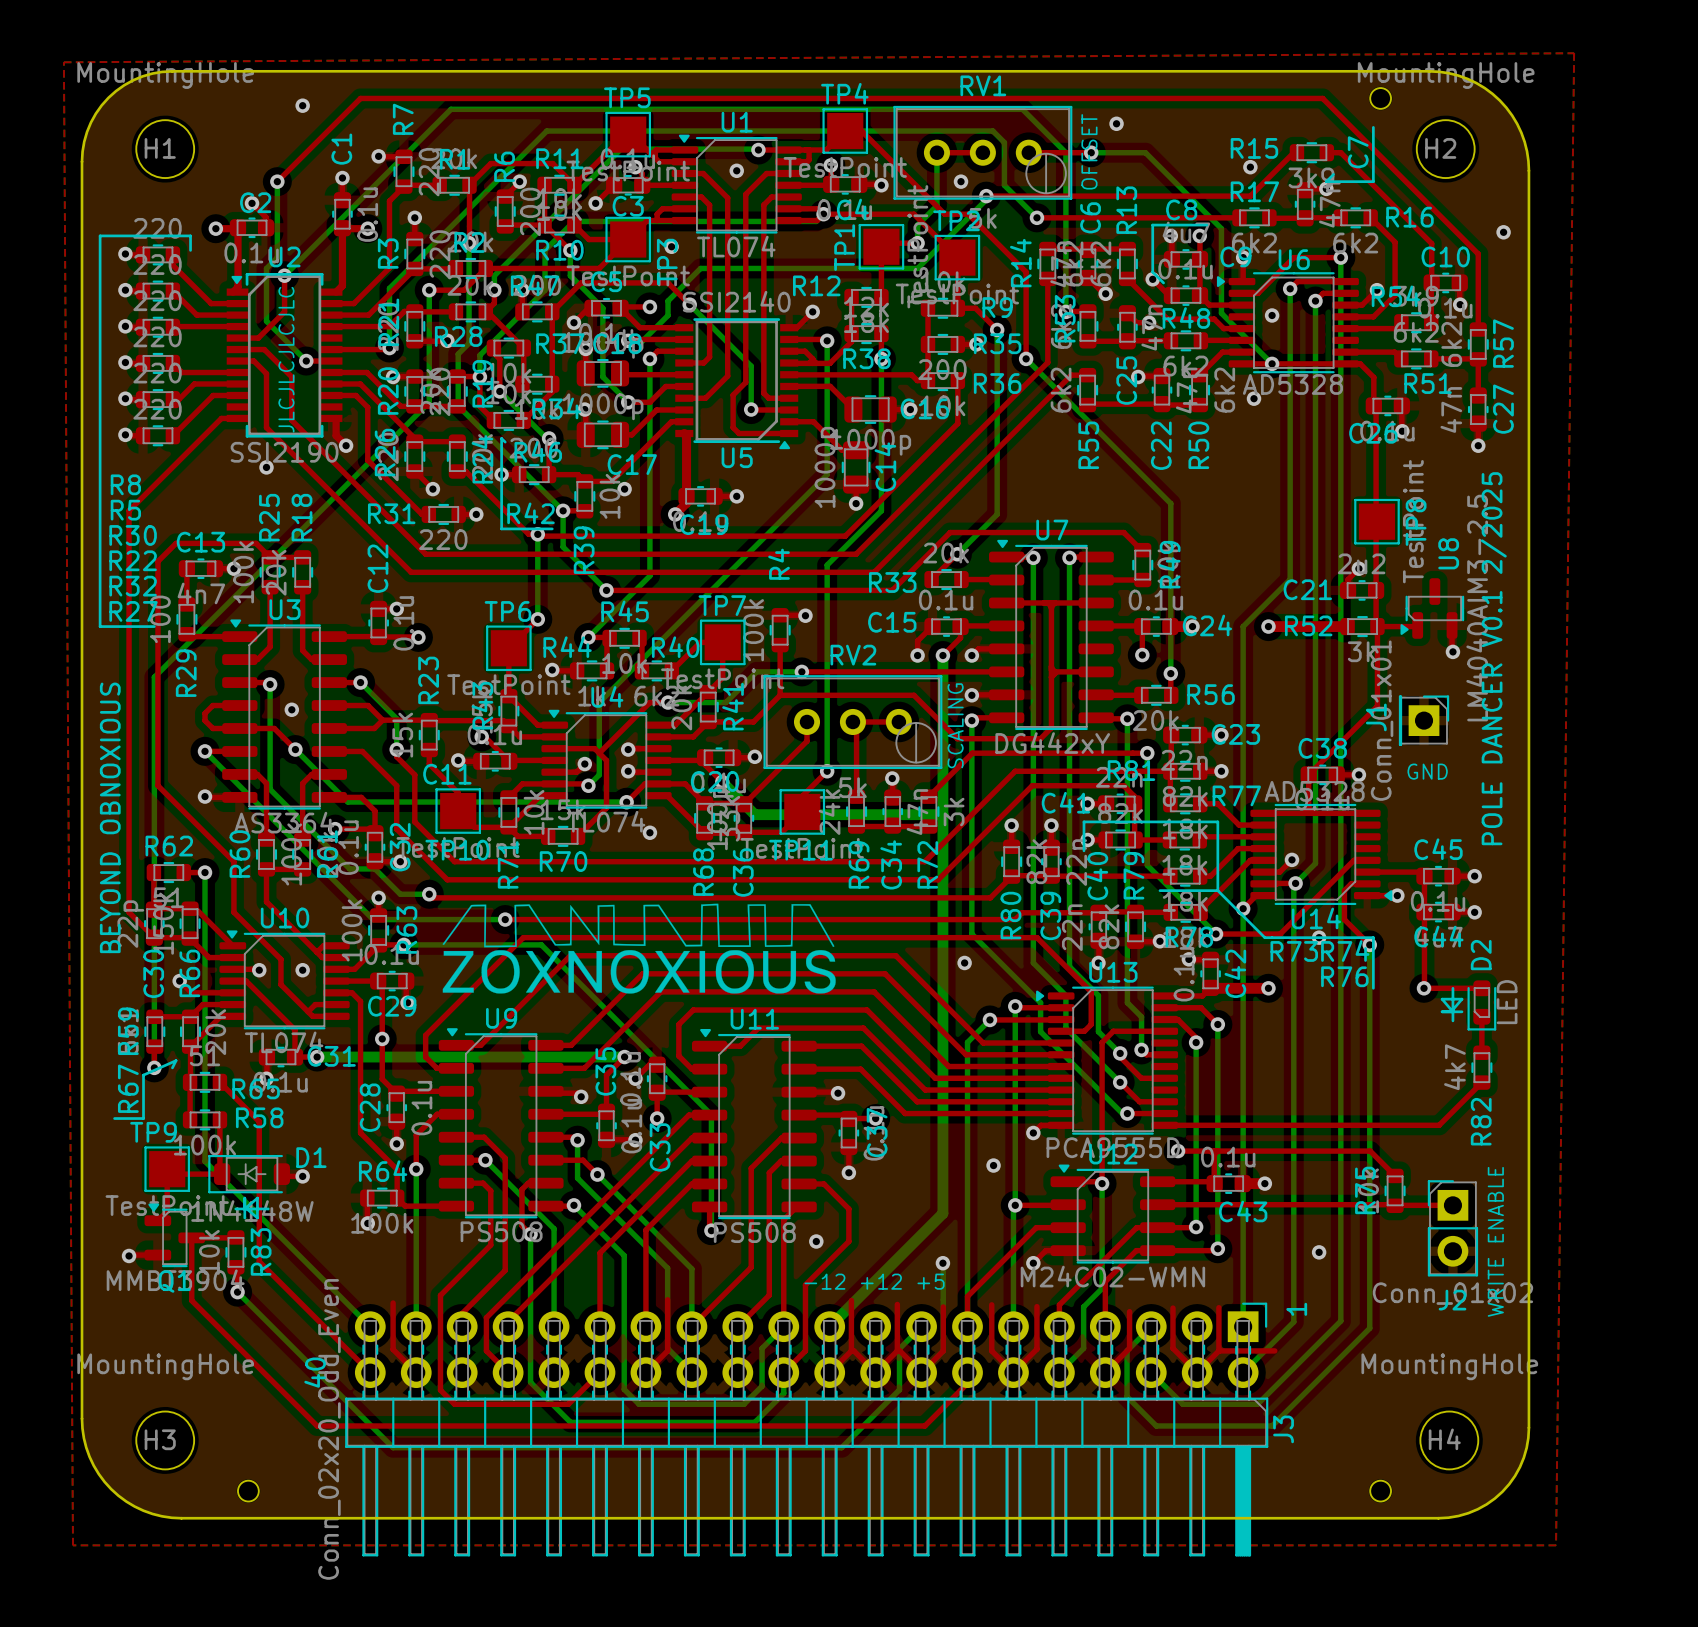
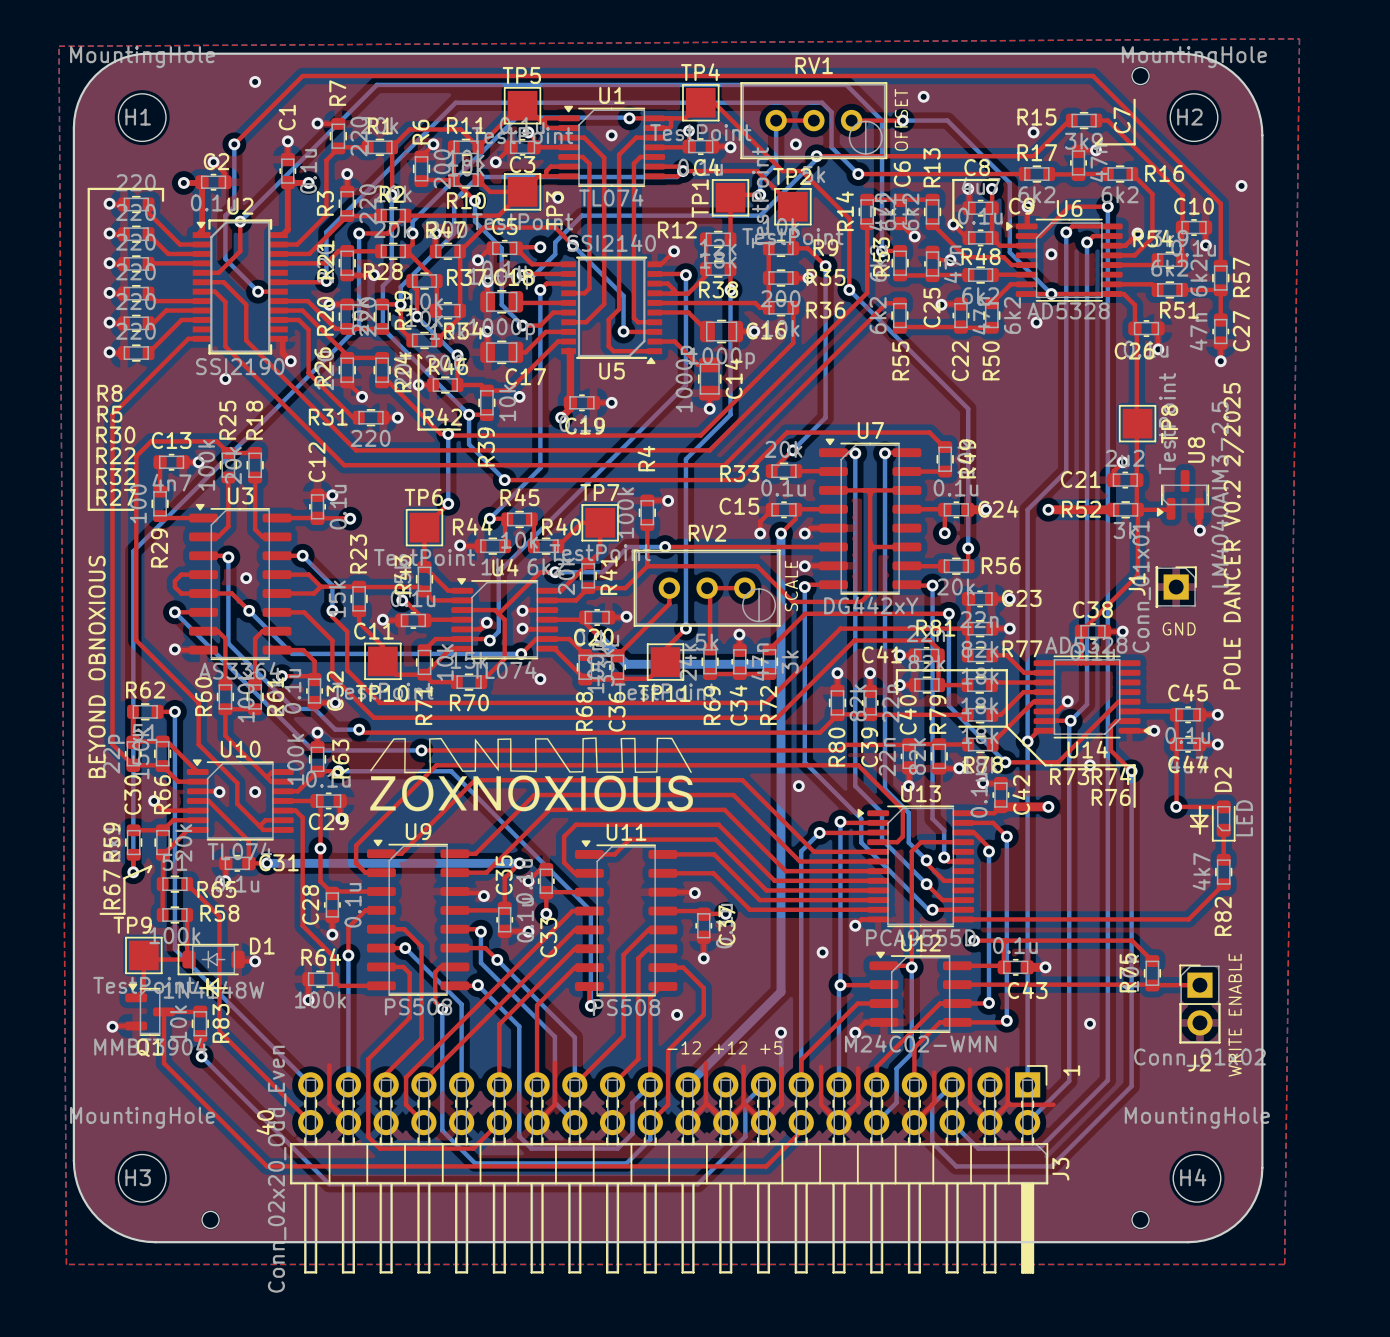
text: JLCJLCJLCJLC (286, 359) -> none
text: POLE DANCER V0.1 2/2025 (1493, 658) -> POLE DANCER V0.2 2/2025 (1233, 536)
text: SCALING (955, 725) -> SCALE (791, 586)

